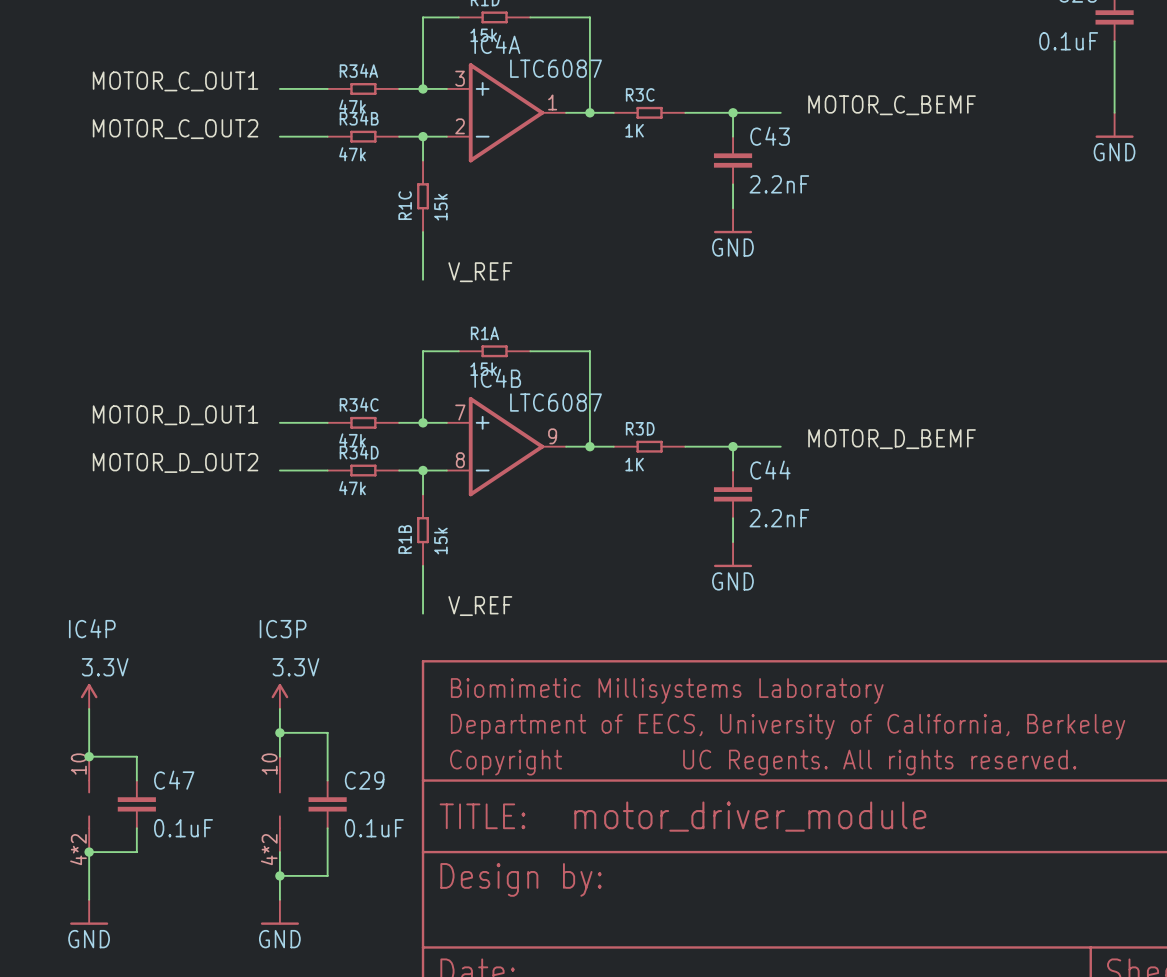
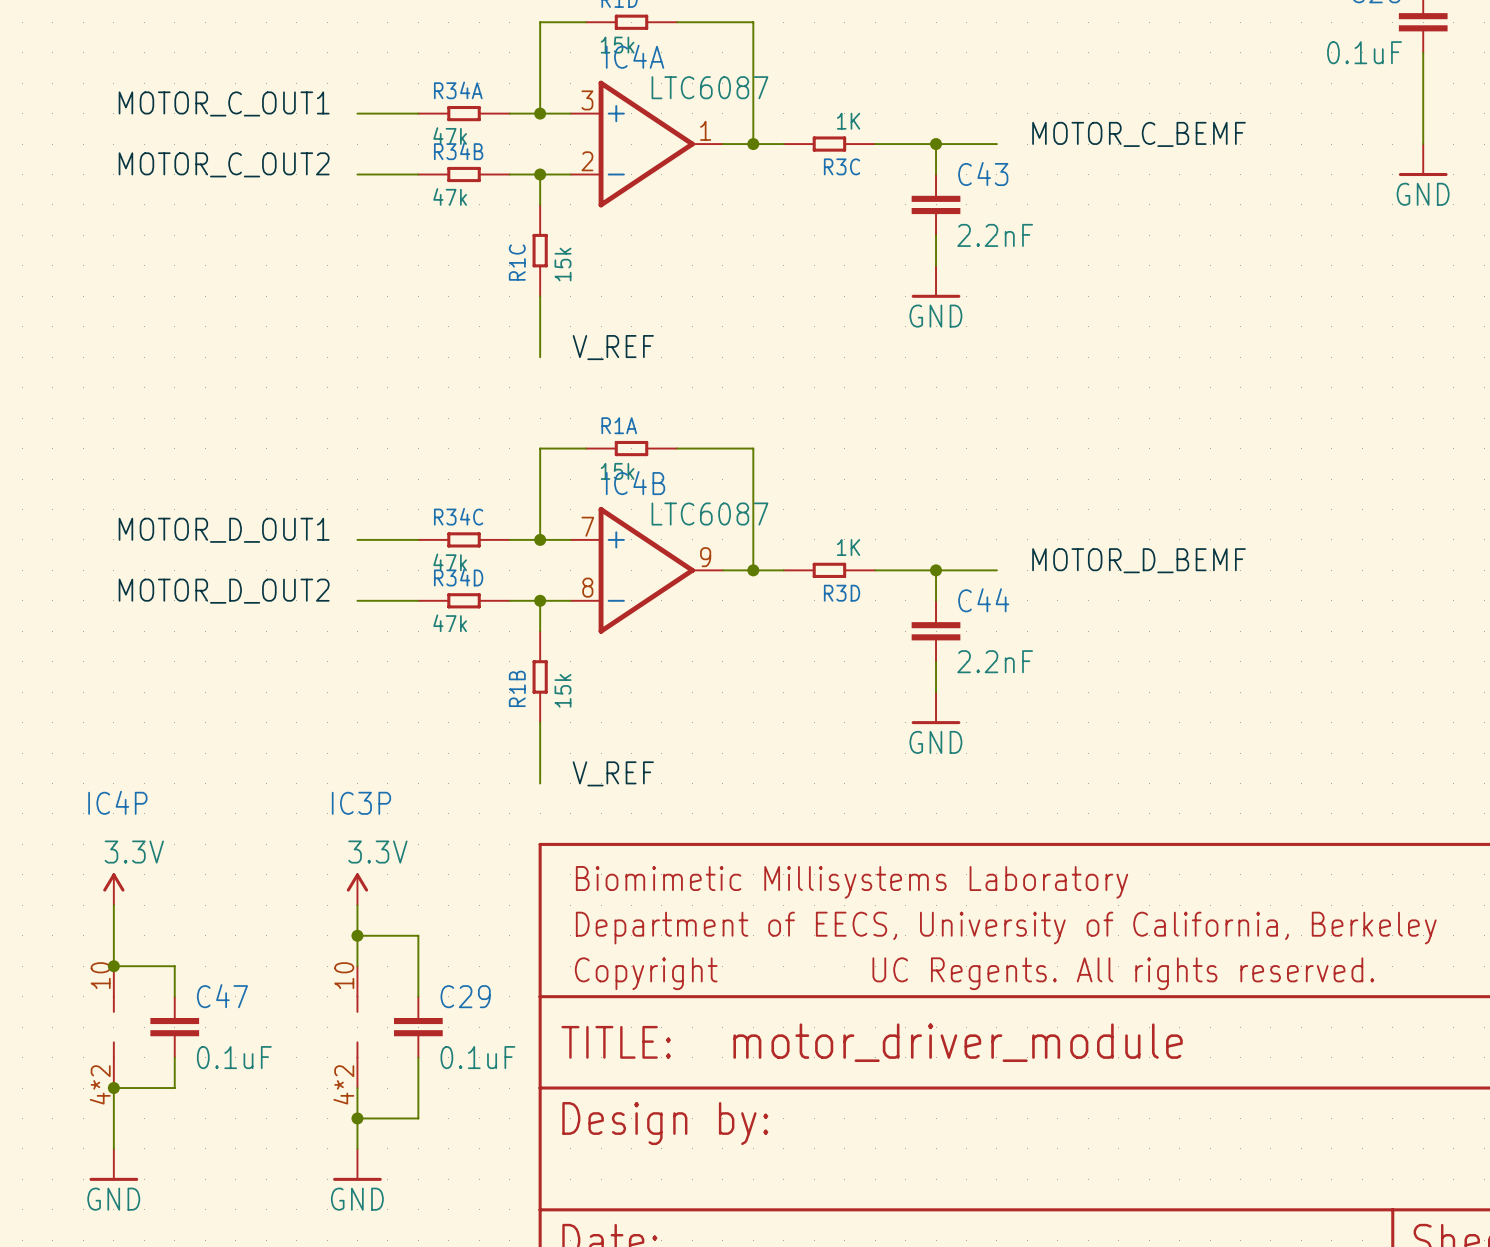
R3C name position: R3C (640, 94) -> R3C (842, 166)
R3C value position: 1K (634, 130) -> 1K (848, 121)
R3D name position: R3D (640, 428) -> R3D (842, 593)
R3D value position: 1K (634, 464) -> 1K (848, 547)

